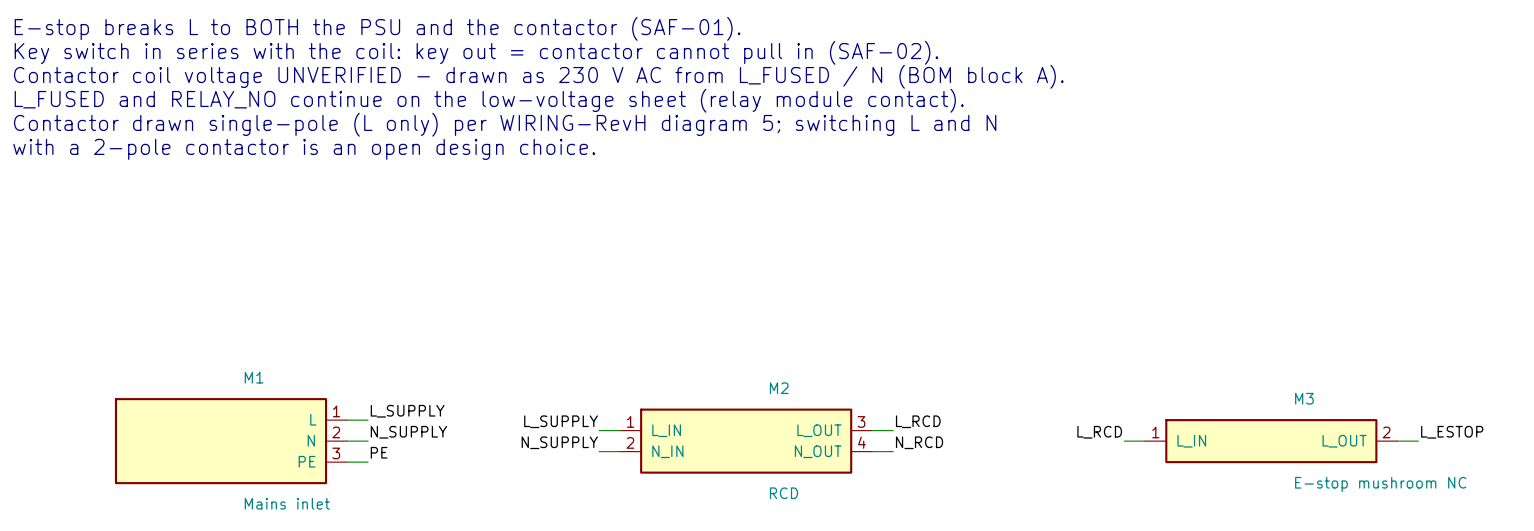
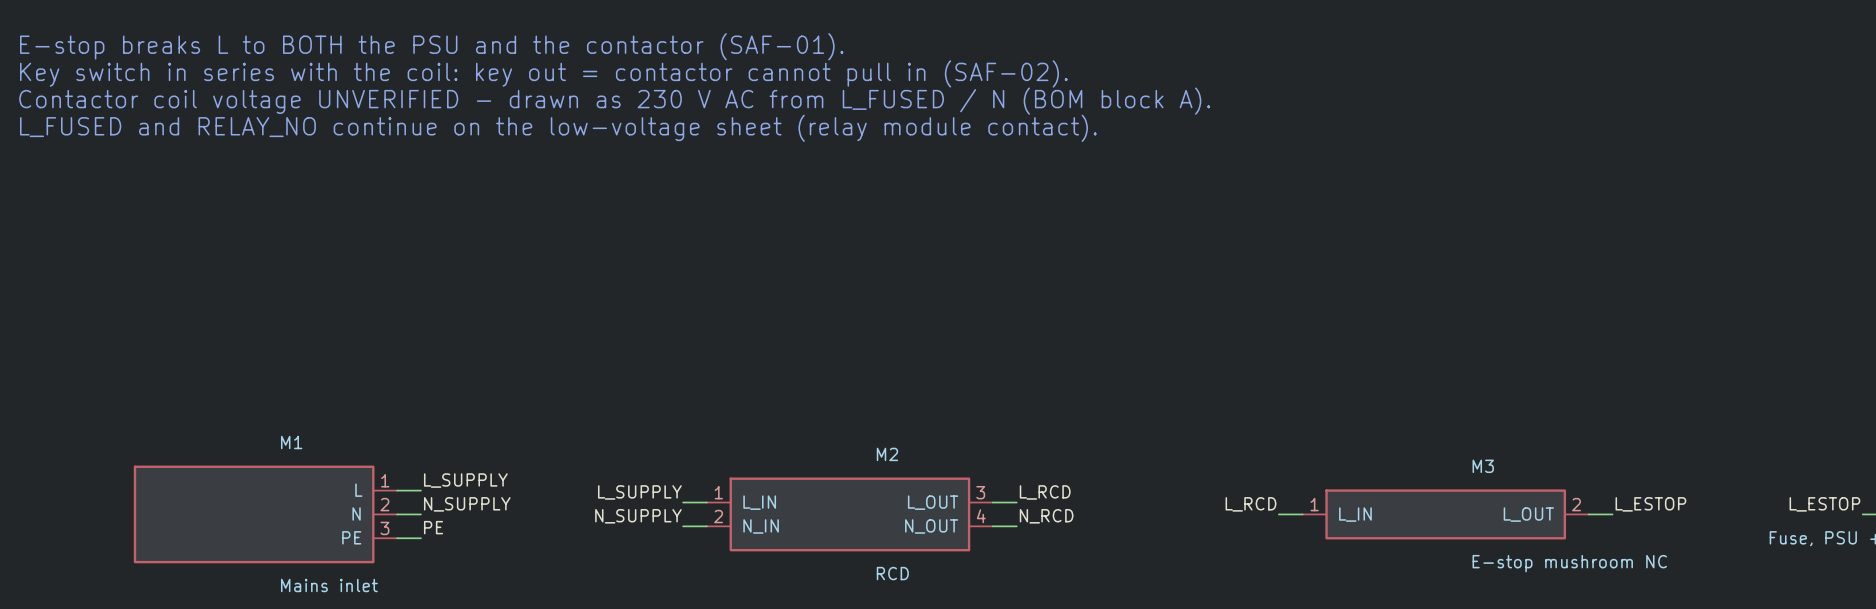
text: Contactor drawn single-pole (L only) per WIRING-RevH diagram 5; switching L and N (505, 124) -> none
text: with a 2-pole contactor is an open design choice. (304, 149) -> none

